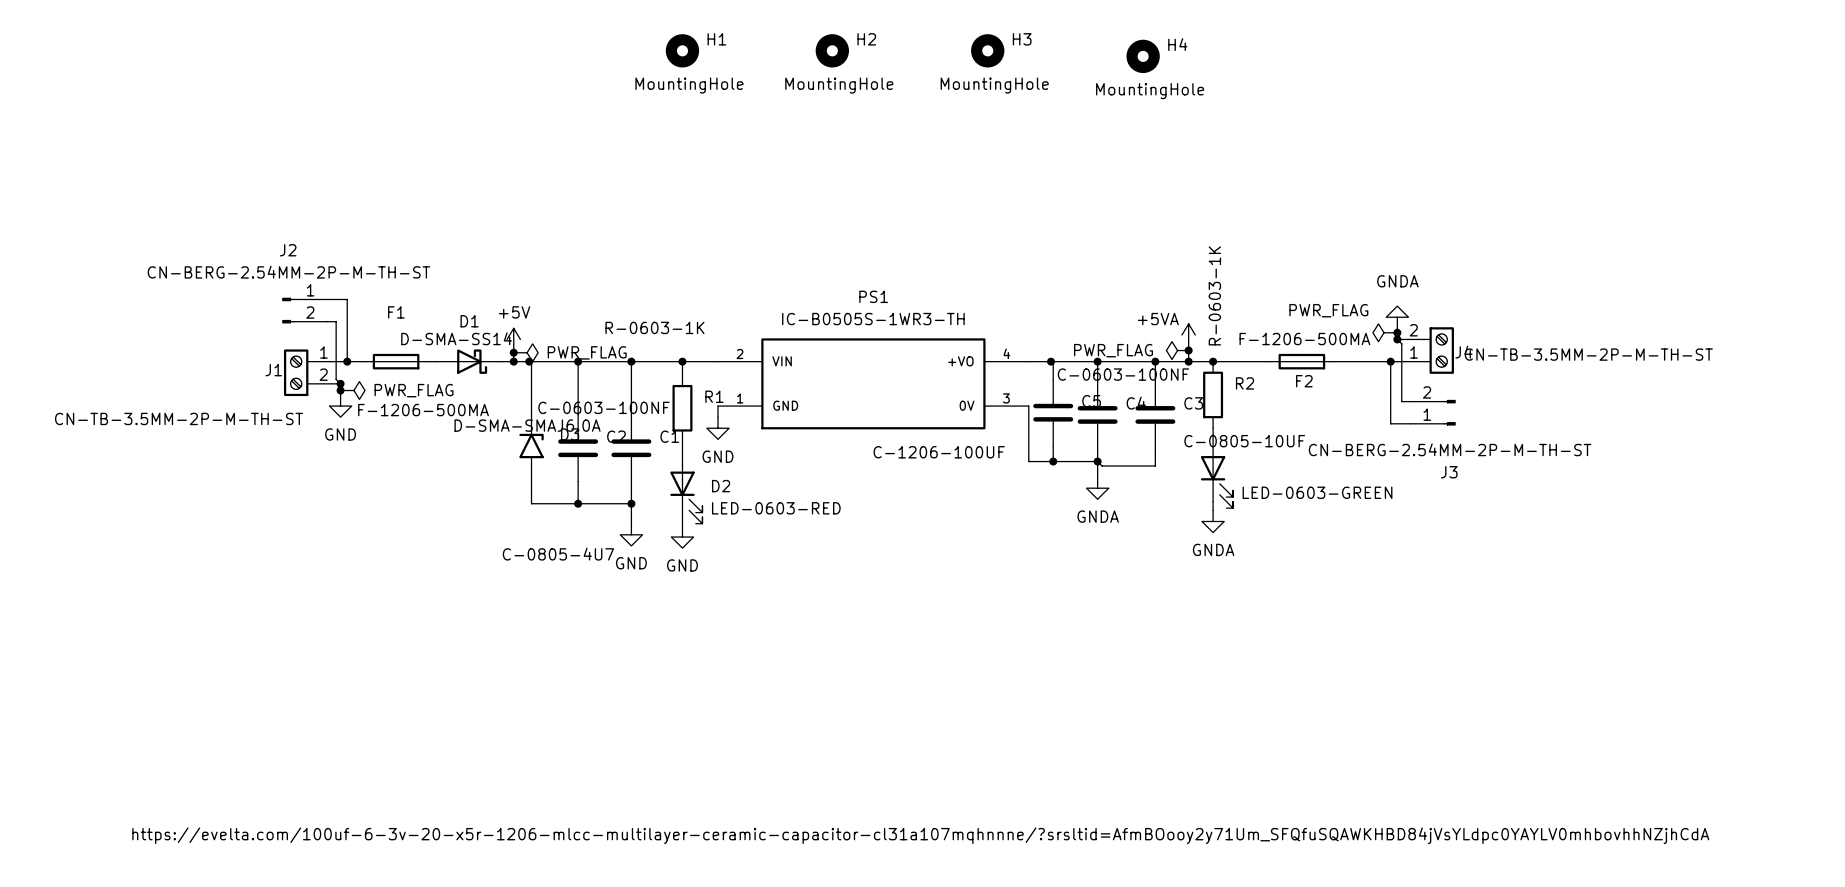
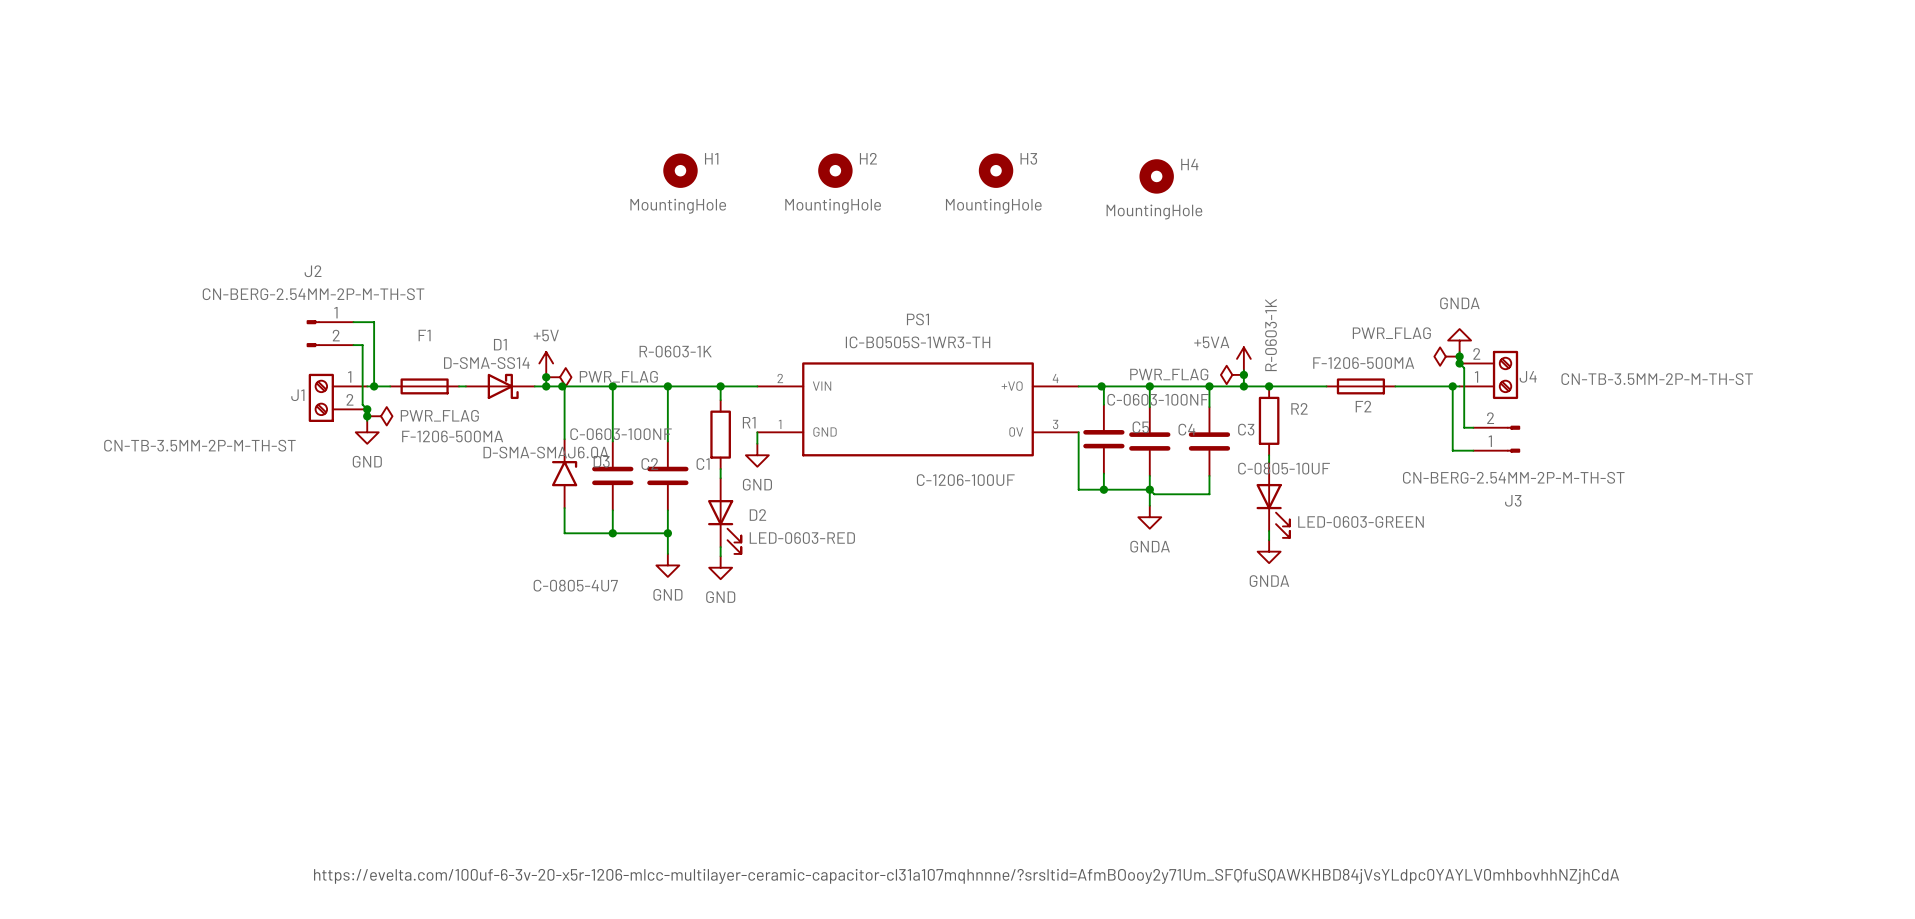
H1 position: (682, 50) -> (680, 170)
H2 position: (832, 50) -> (835, 170)
H3 position: (987, 50) -> (996, 170)
H4 position: (1143, 56) -> (1156, 176)

